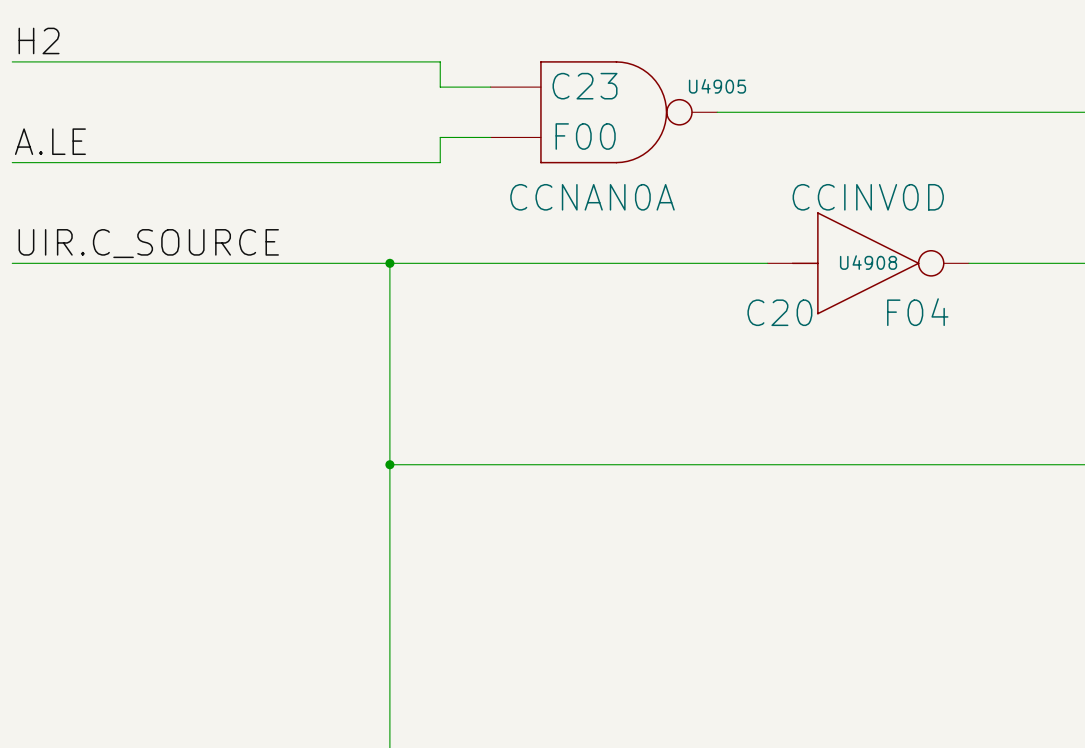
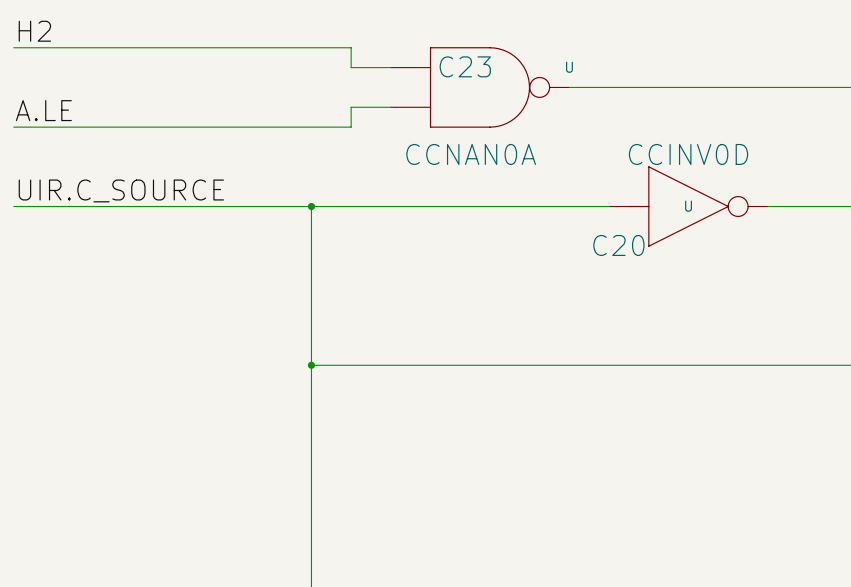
U4905 name: U4905 (717, 86) -> U (569, 67)
U4905 value: F00 (585, 136) -> none
U4908 name: U4908 (868, 262) -> U (688, 206)
U4908 value: F04 (917, 312) -> none

